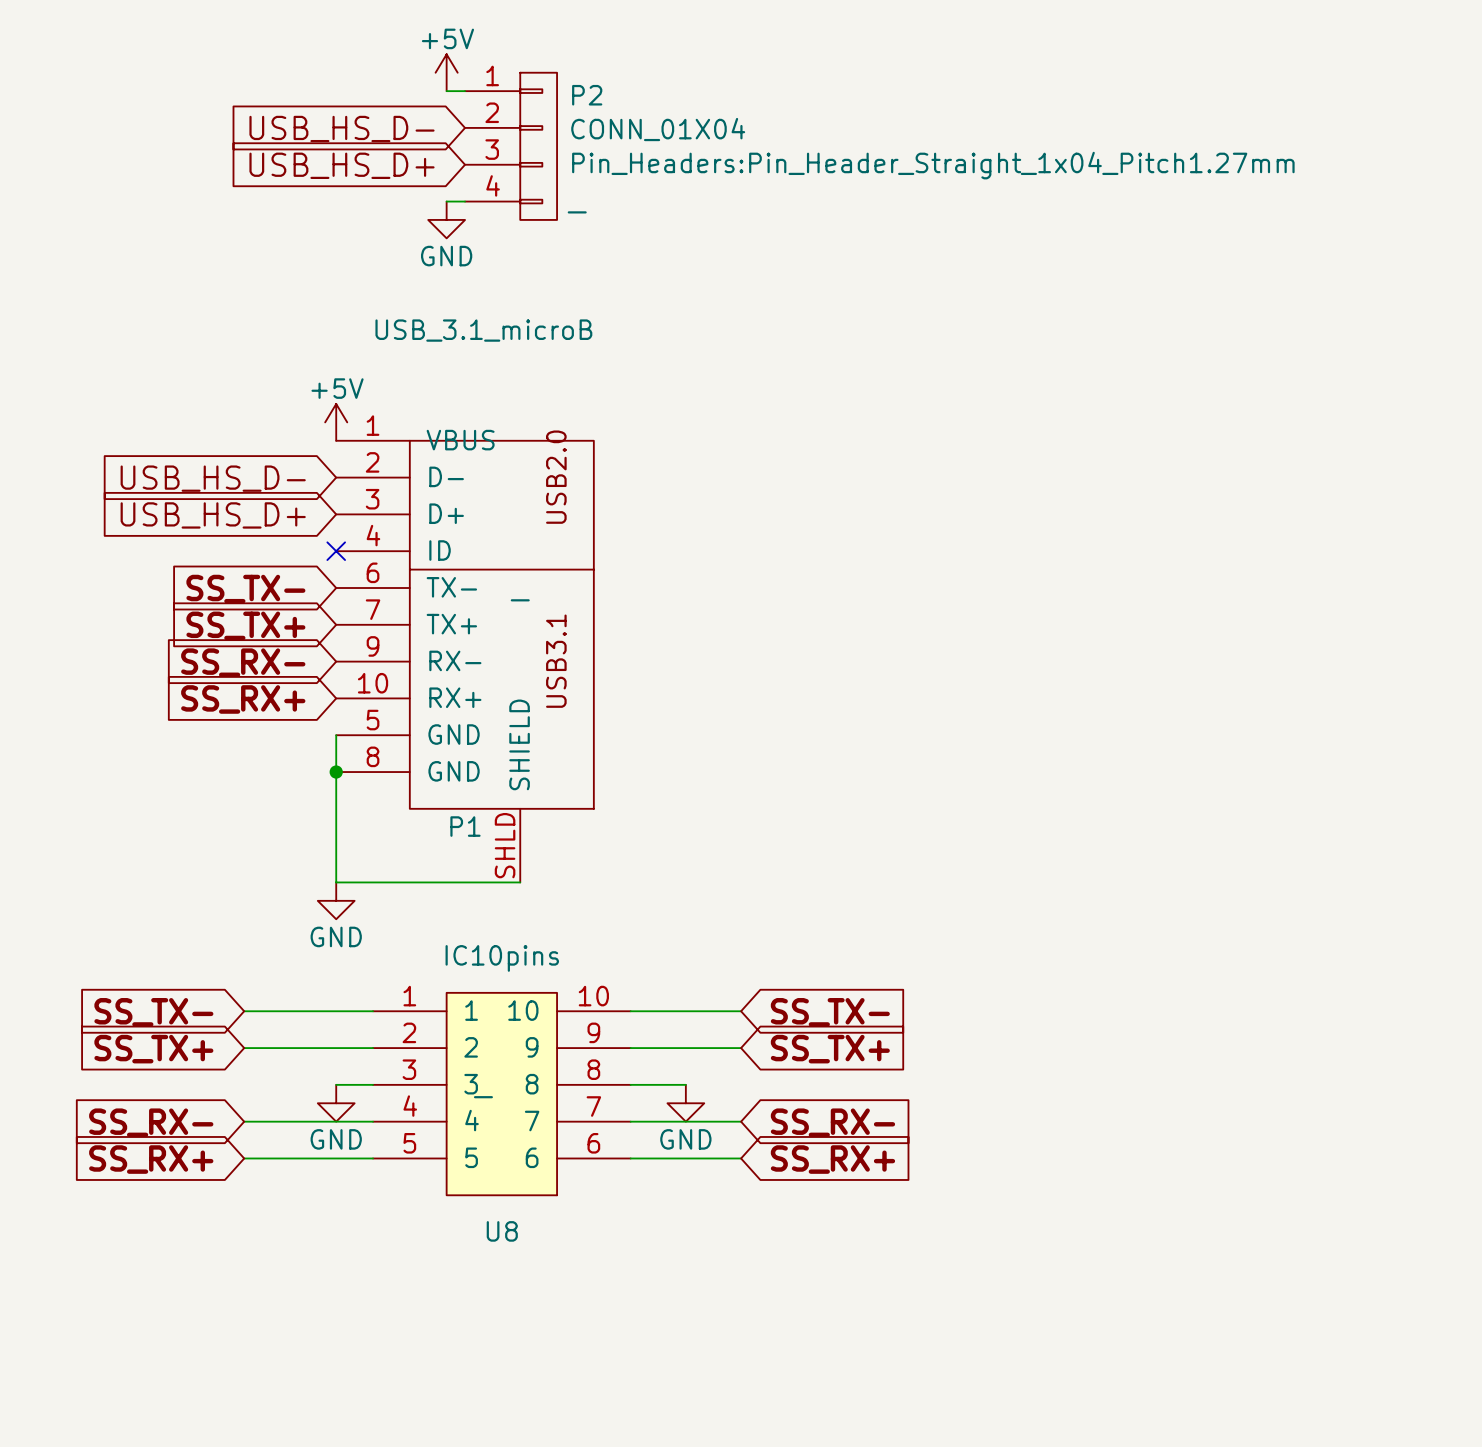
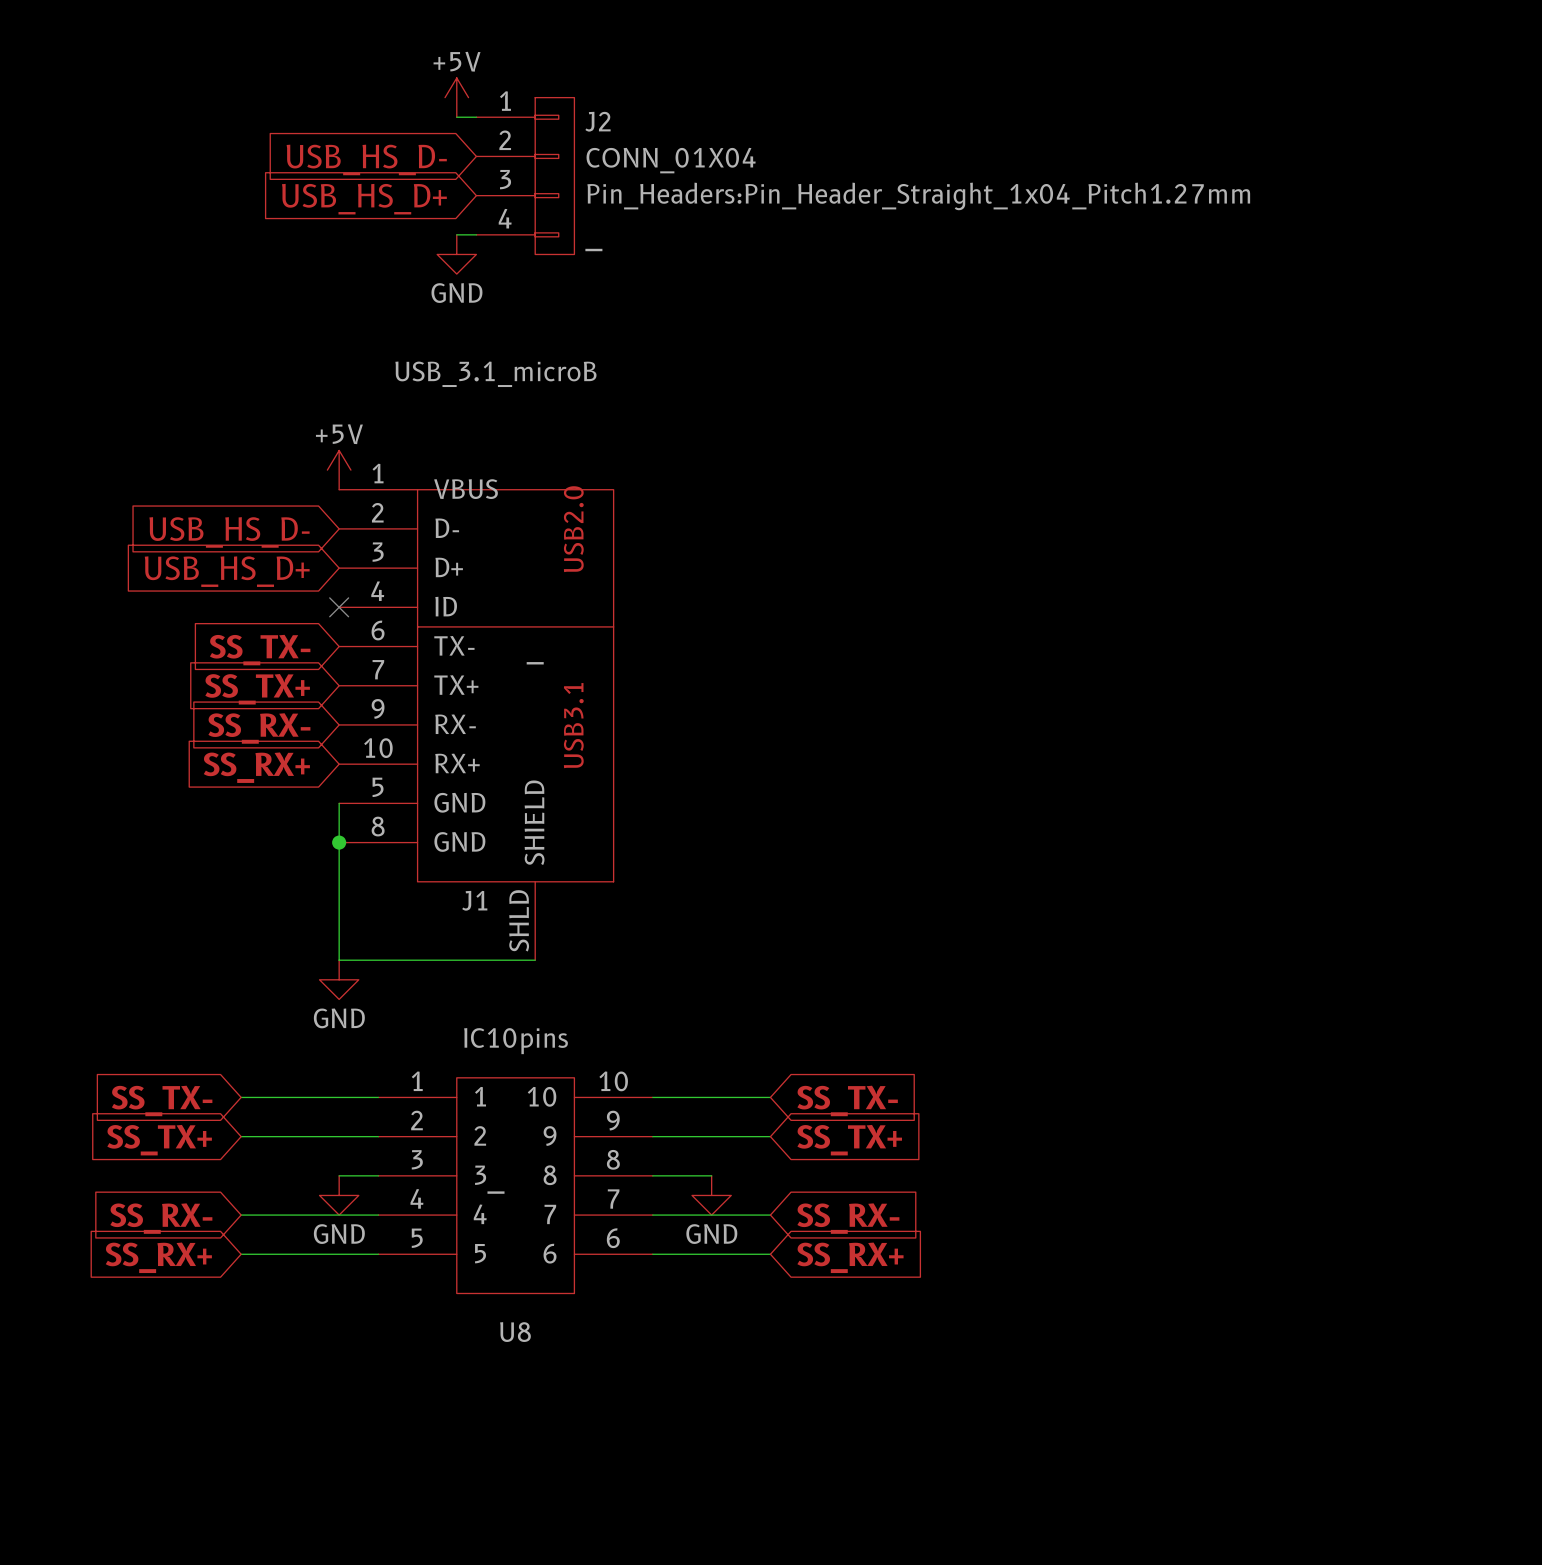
P2 name: P2 (587, 95) -> J2 (598, 121)
P1 name: P1 (465, 826) -> J1 (474, 900)

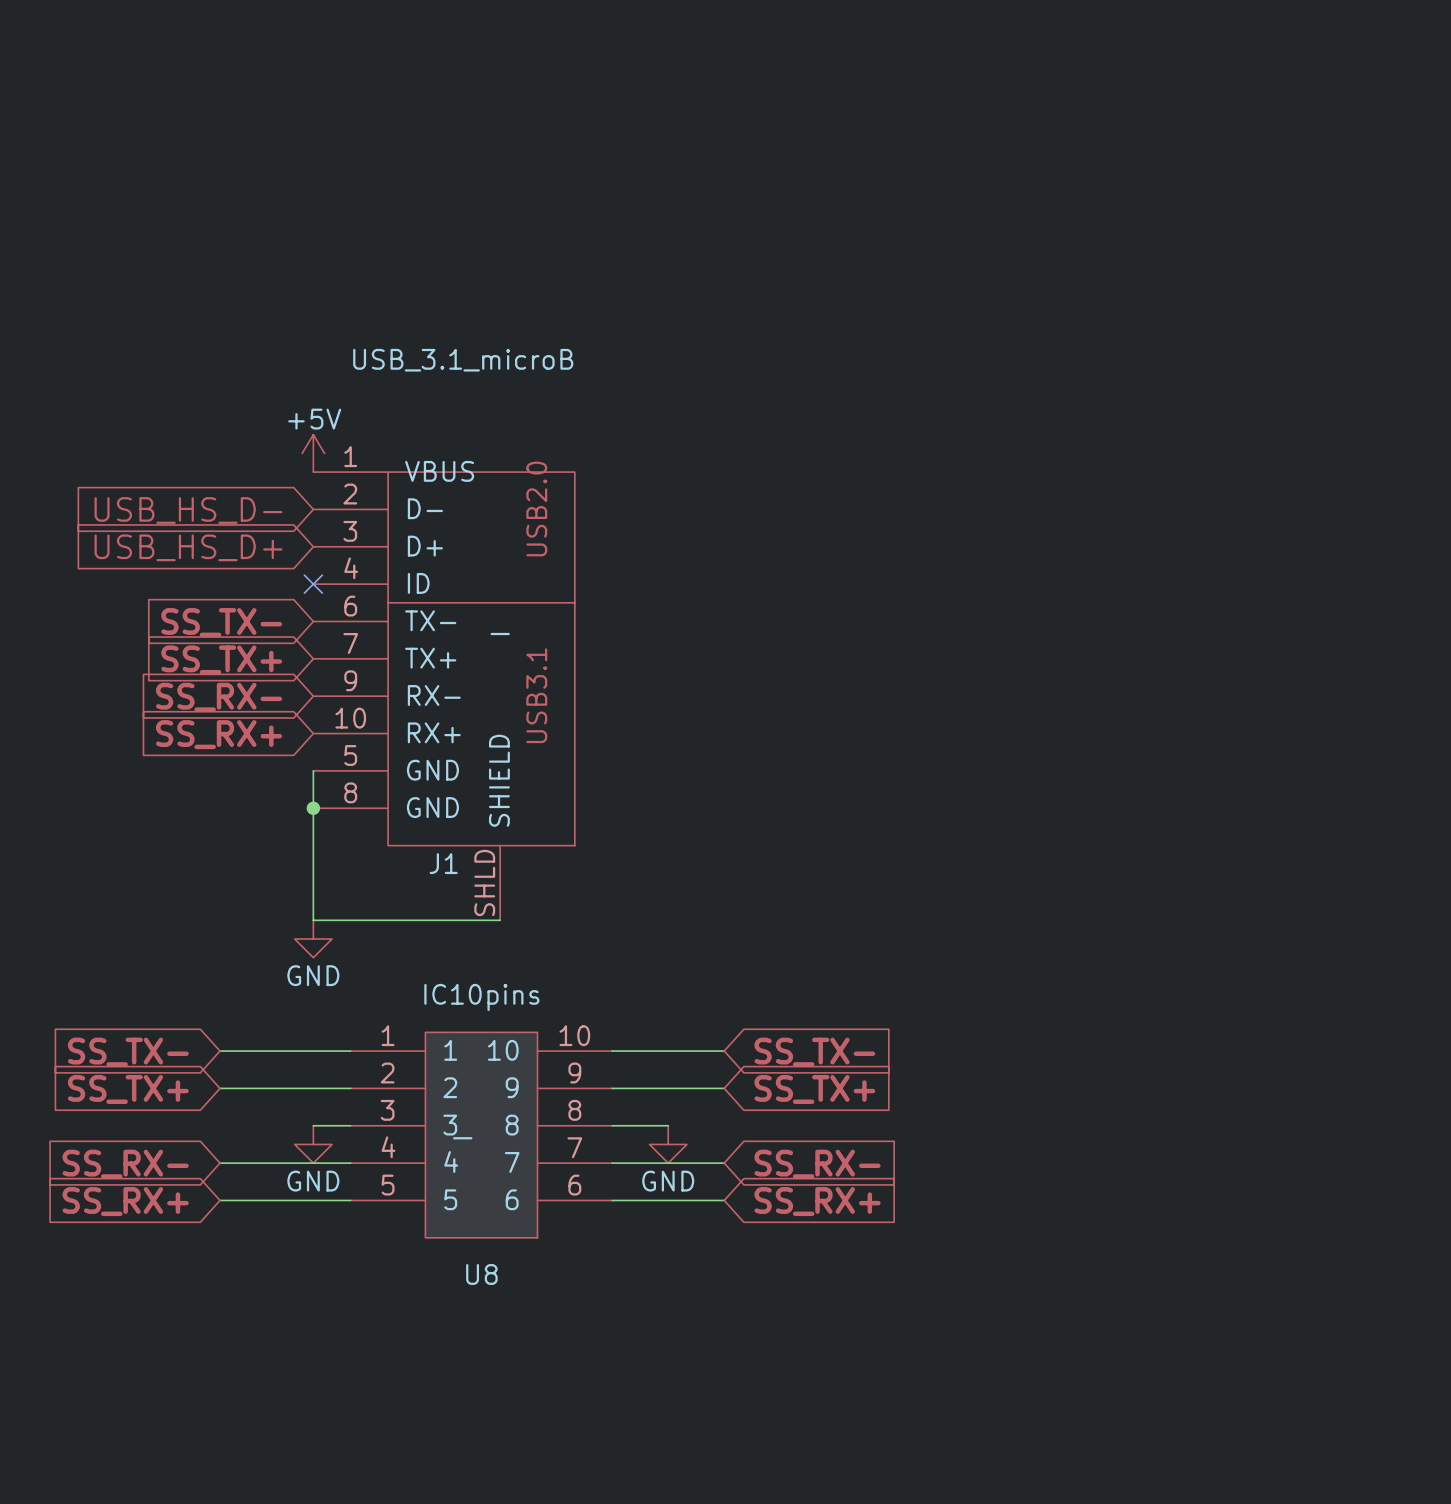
power symbol: +5V (456, 97) -> none
wire: (456, 117) (476, 117) -> none
global label: USB_HS_D- (366, 159) -> none
J2: CONN_01X04 (525, 176) -> none
global label: USB_HS_D+ (364, 199) -> none
wire: (456, 234) (476, 234) -> none
power symbol: GND (456, 254) -> none

